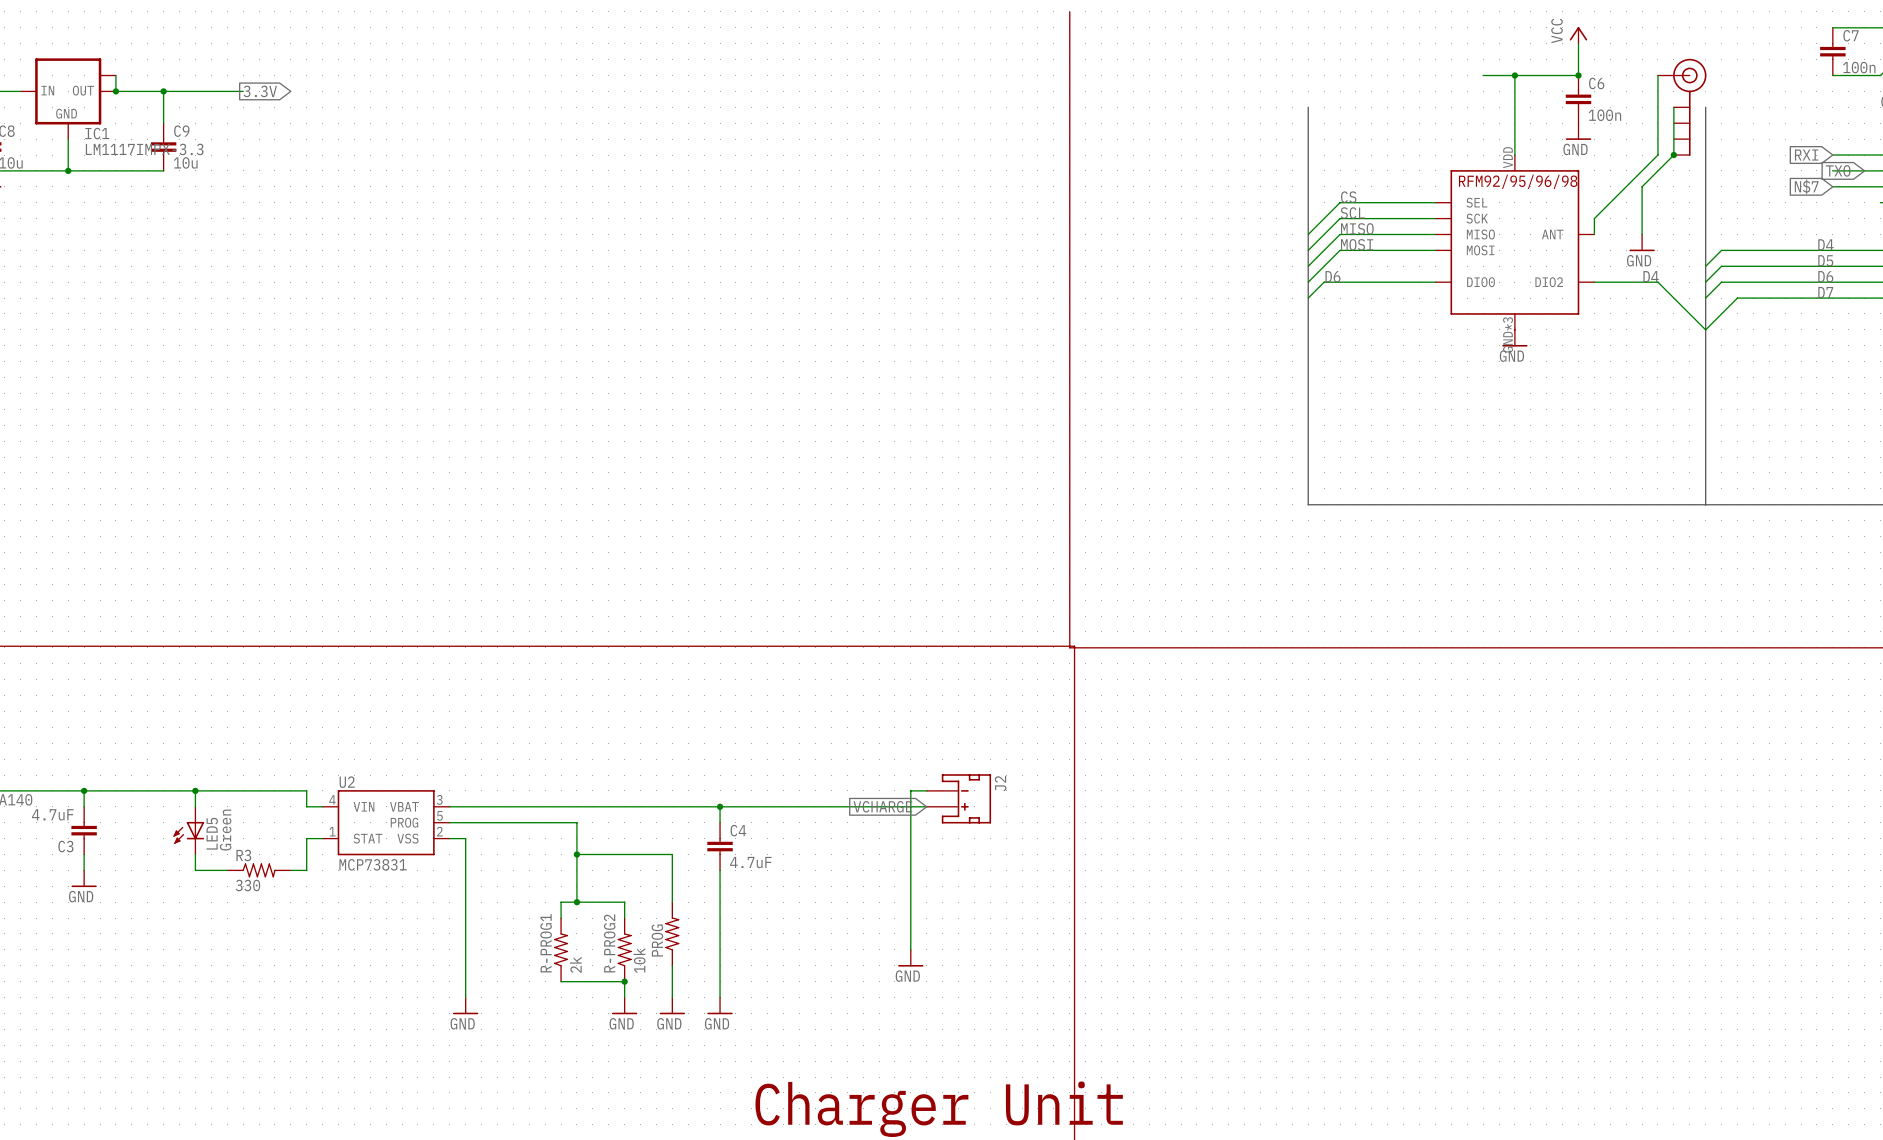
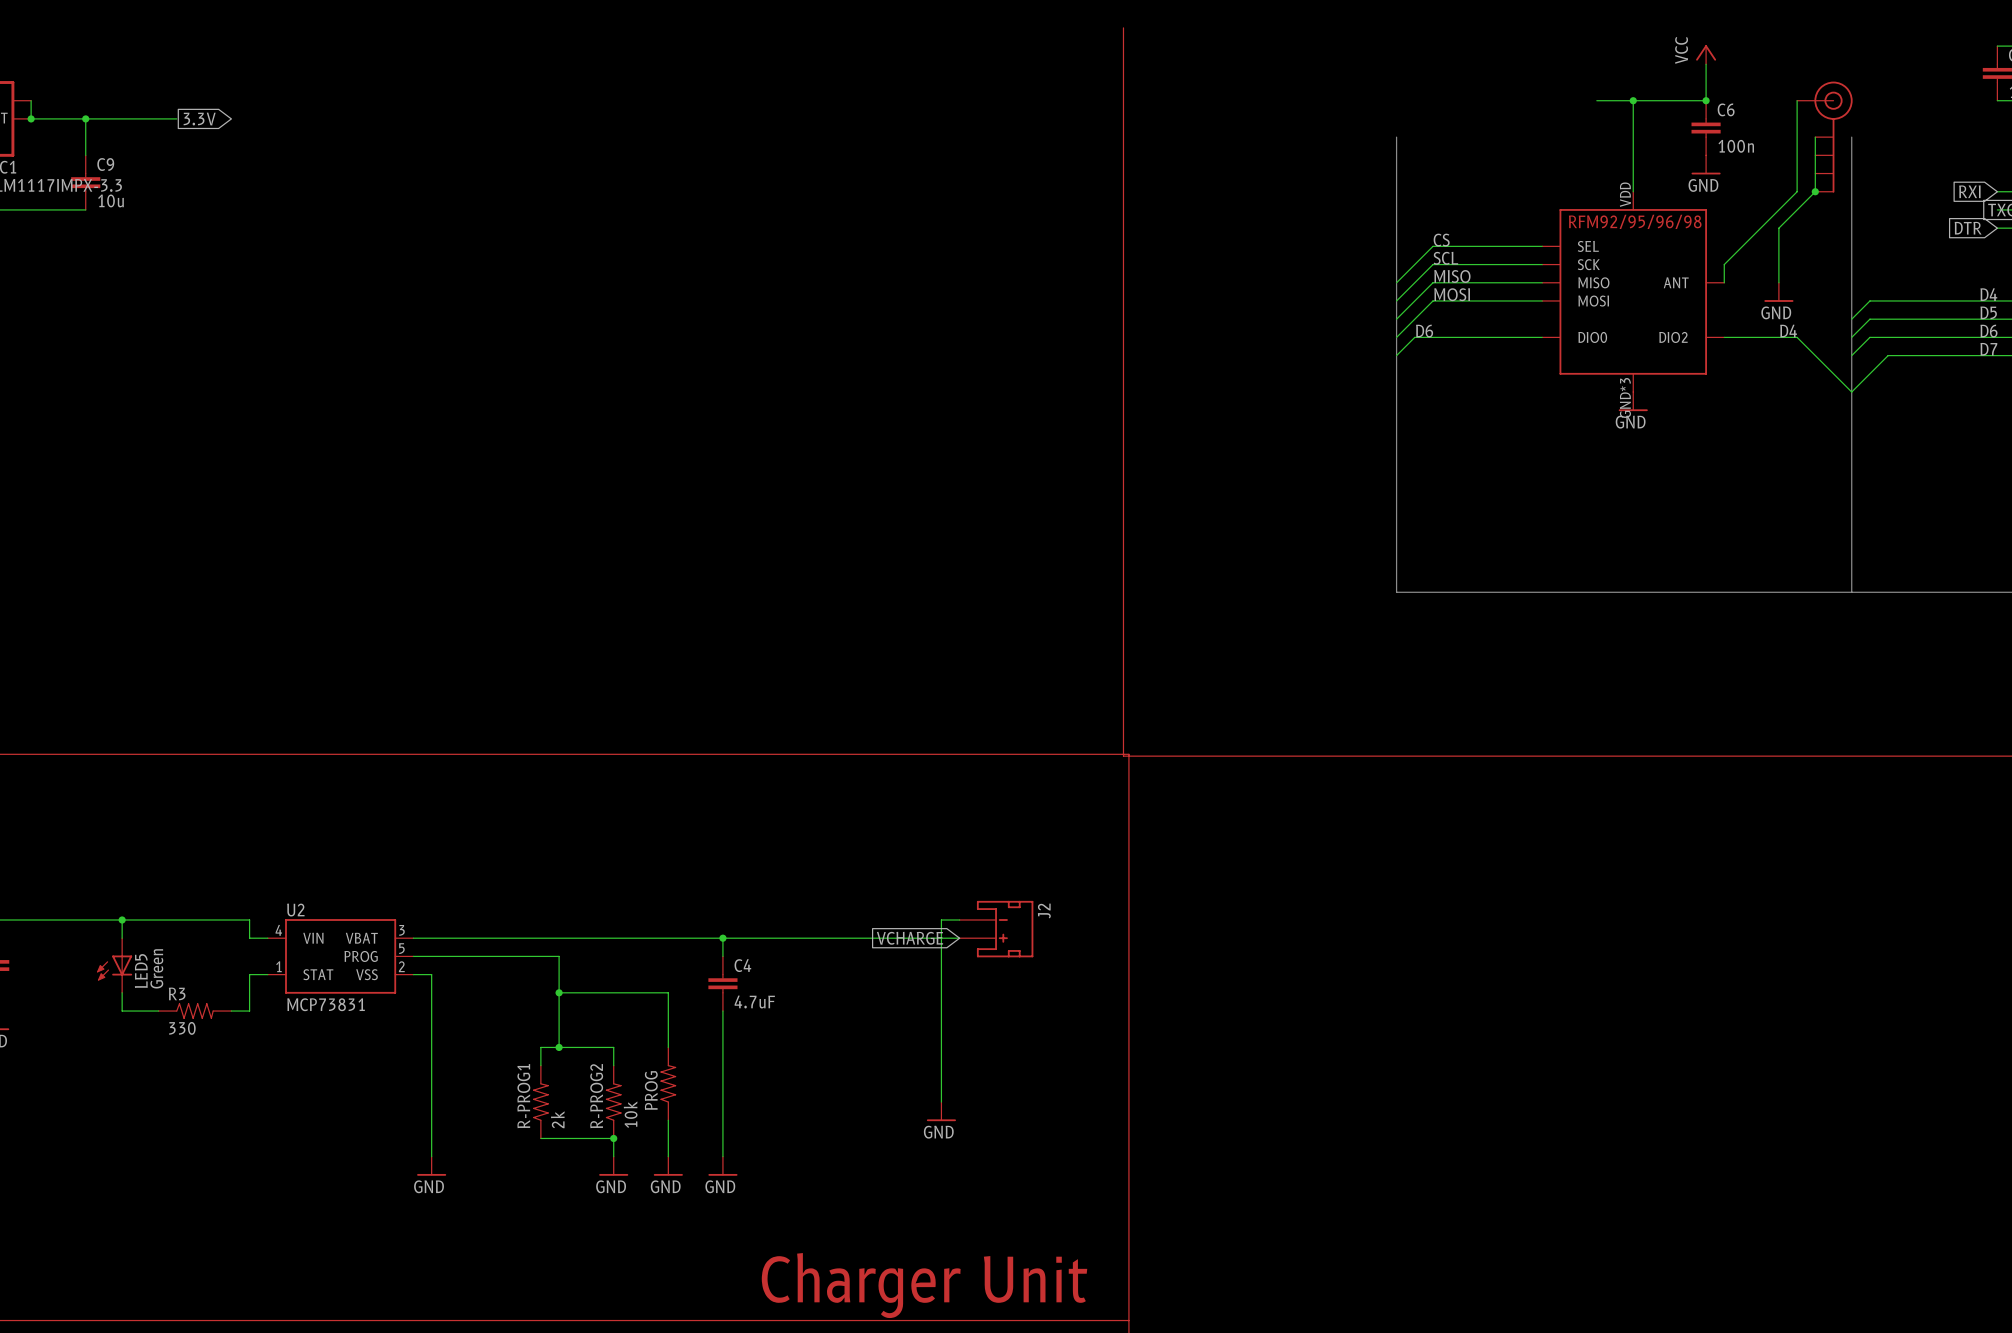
global label: N$7 (1806, 186) -> DTR (1968, 228)

